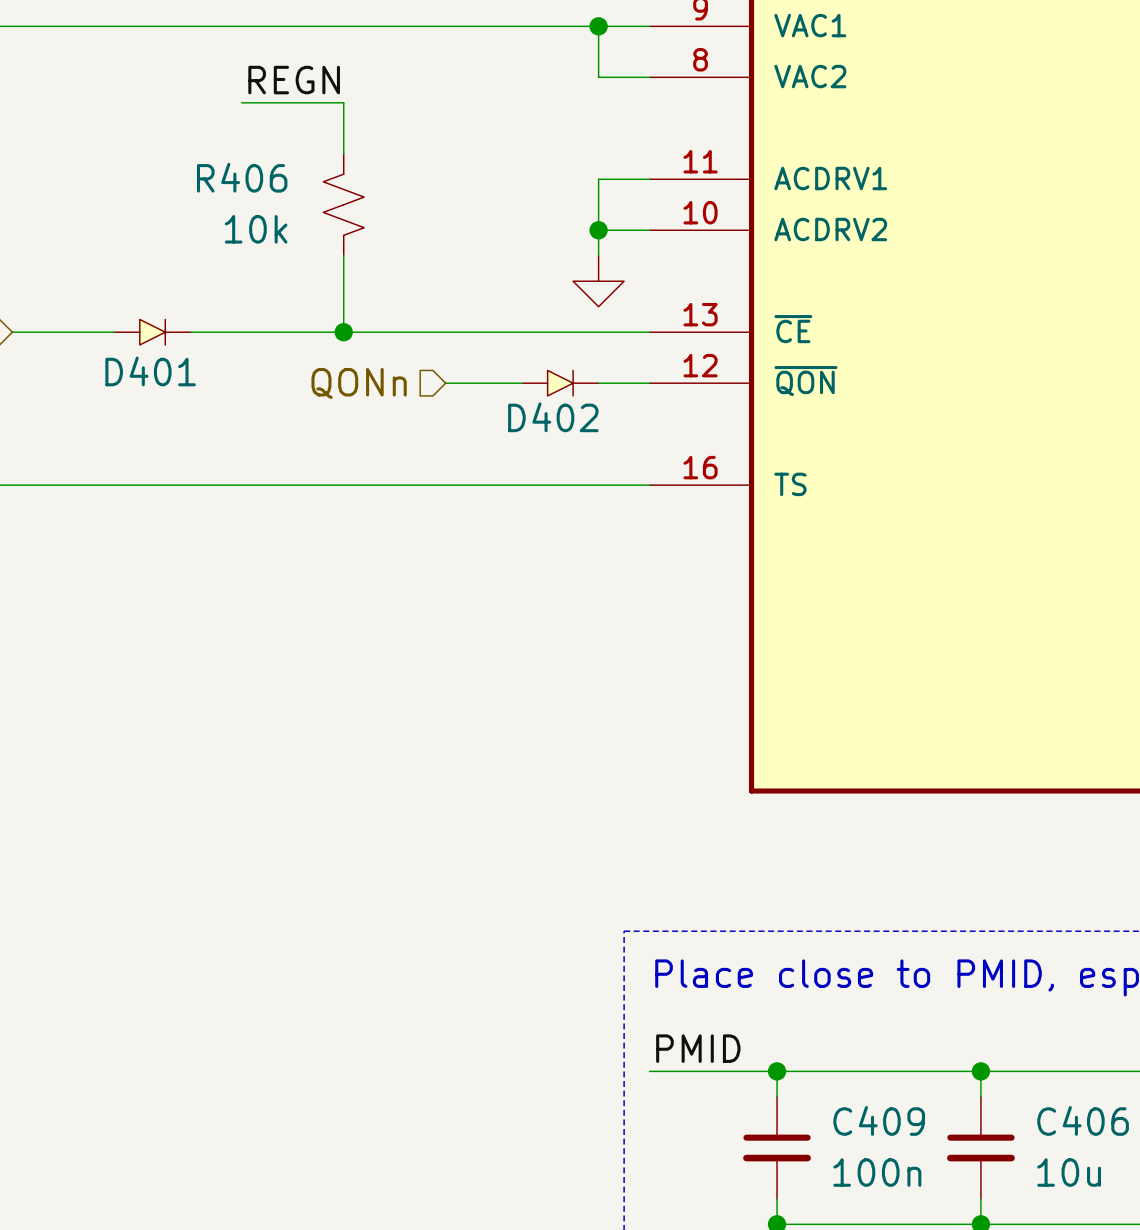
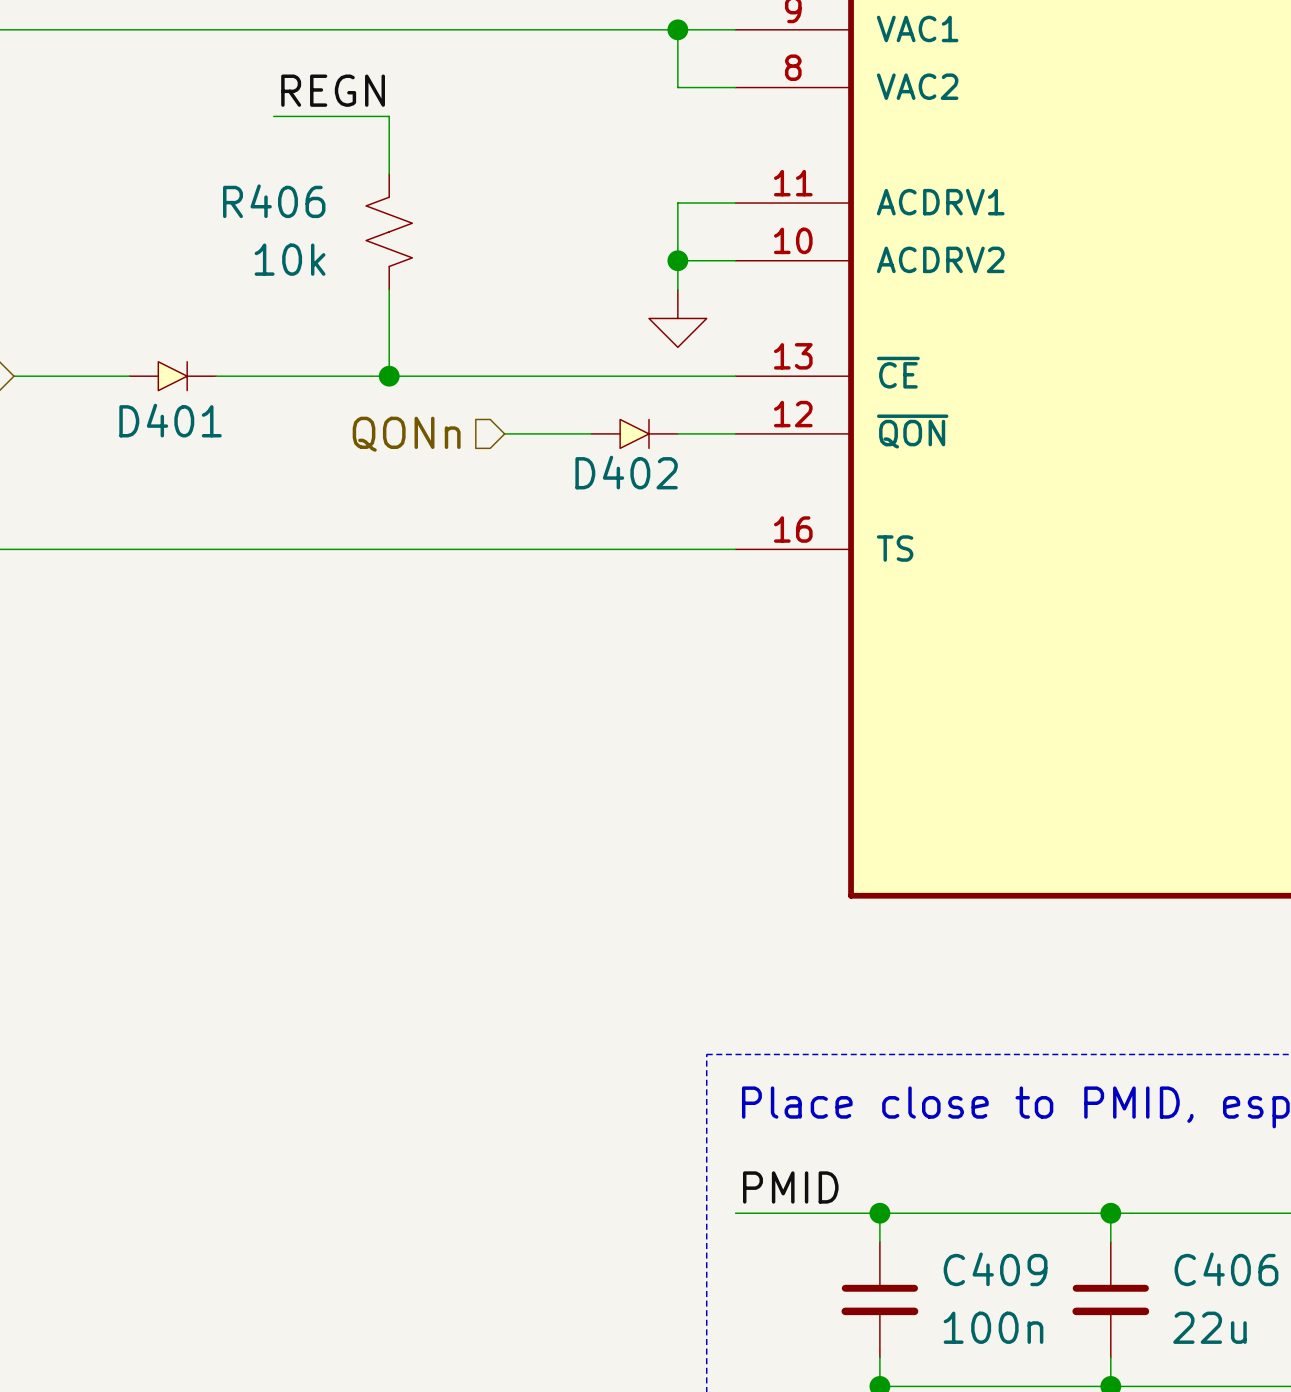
C406 value: 10u (1069, 1172) -> 22u (1209, 1327)

